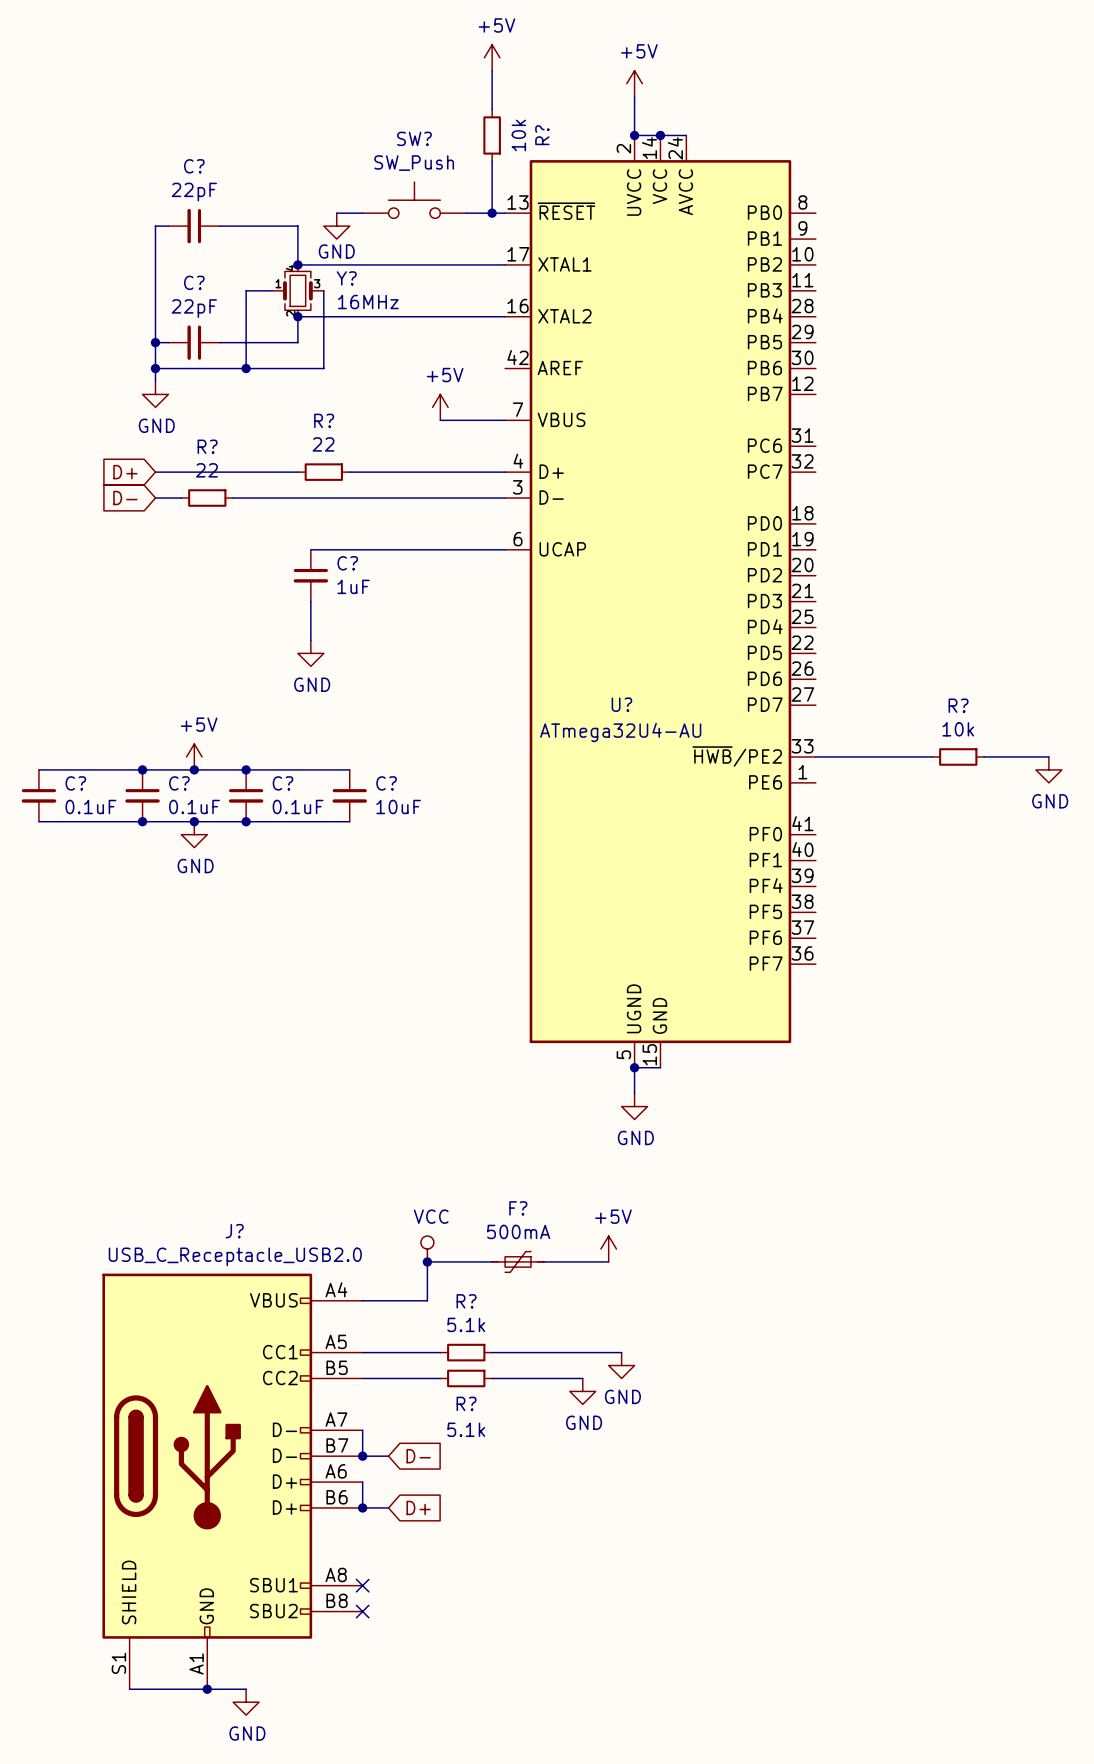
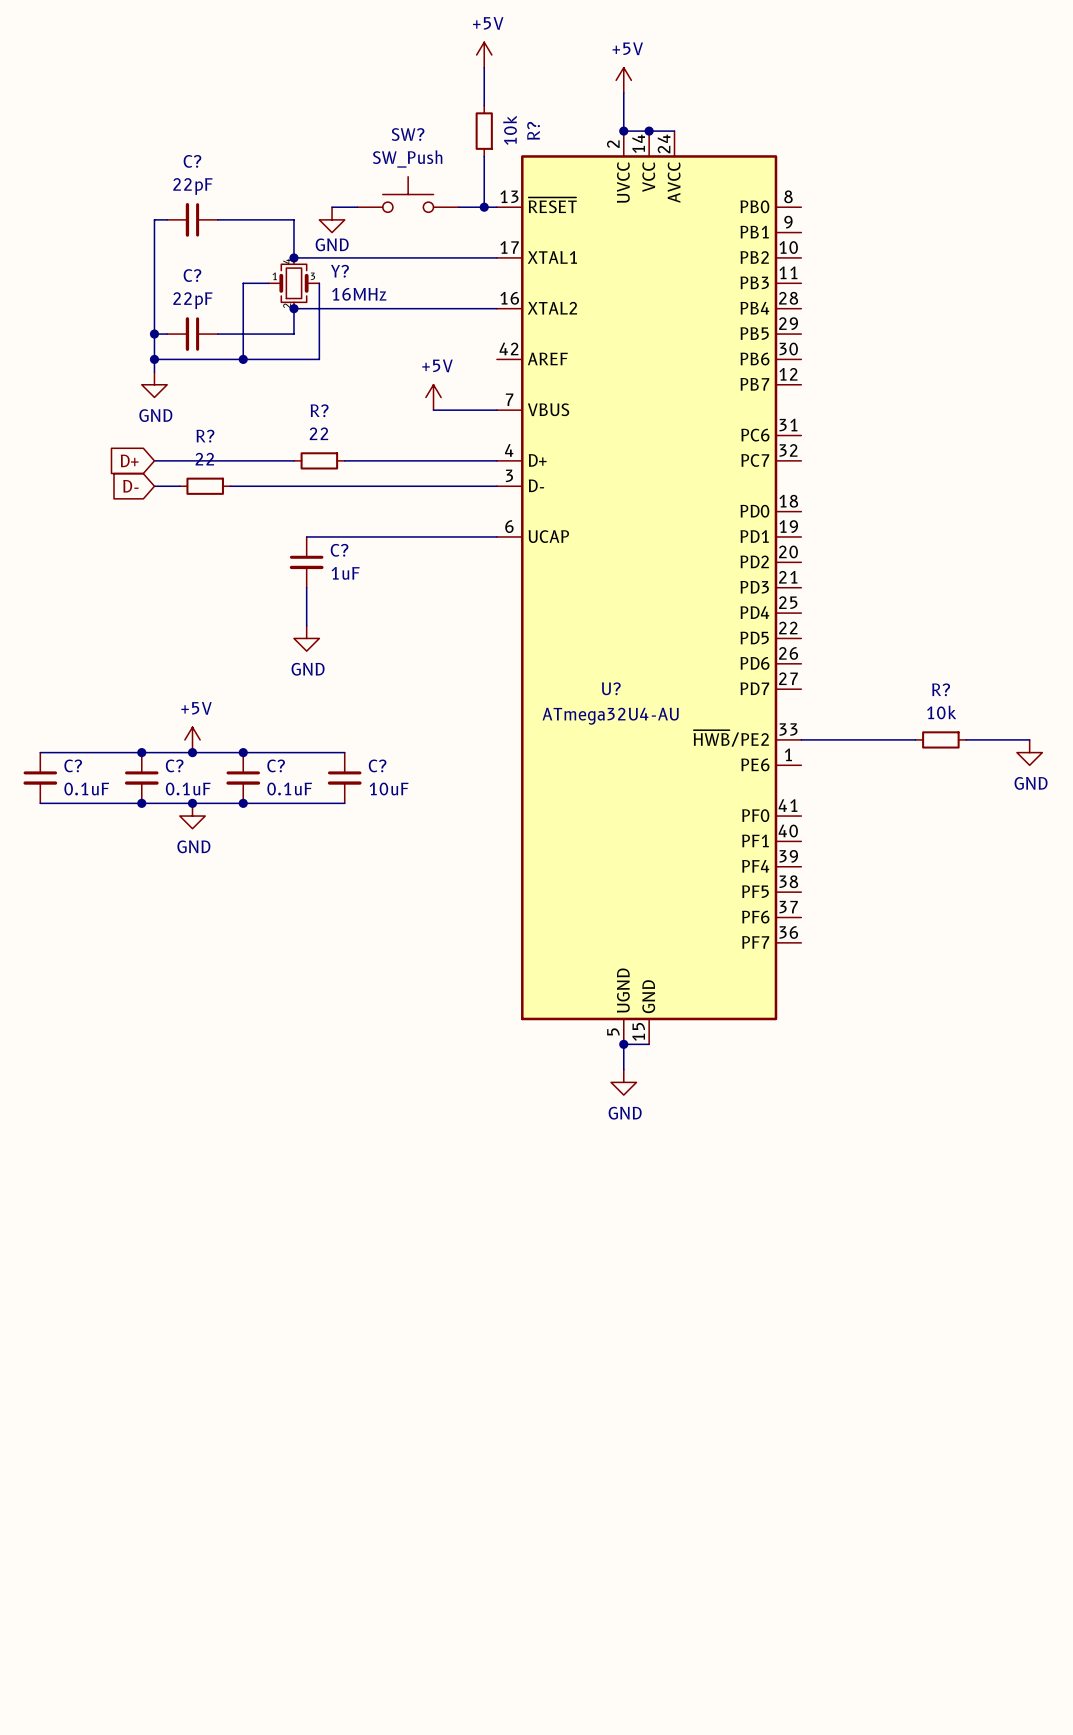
power symbol: VCC (427, 1249) -> none
power symbol: +5V (608, 1249) -> none
junction: (427, 1261) -> none
wire: (492, 1261) (427, 1261) (427, 1300) (362, 1300) -> none
F?: 500mA (518, 1261) -> none
wire: (543, 1261) (608, 1261) -> none
wire: (362, 1352) (440, 1352) -> none
R?: 5.1k (466, 1352) -> none
wire: (492, 1352) (621, 1352) -> none
power symbol: GND (621, 1365) -> none
wire: (362, 1378) (440, 1378) -> none
R?: 5.1k (466, 1378) -> none
wire: (492, 1378) (582, 1378) -> none
power symbol: GND (582, 1391) -> none
wire: (362, 1430) (362, 1456) (388, 1456) -> none
junction: (362, 1456) -> none
global label: D- (418, 1456) -> none
J?: USB_C_Receptacle_USB2.0 (232, 1481) -> none
wire: (362, 1482) (362, 1507) (388, 1507) -> none
junction: (362, 1507) -> none
global label: D+ (418, 1507) -> none
no-connect mark: (362, 1585) -> none
no-connect mark: (362, 1611) -> none
wire: (129, 1689) (246, 1689) -> none
junction: (207, 1689) -> none
power symbol: GND (246, 1702) -> none

